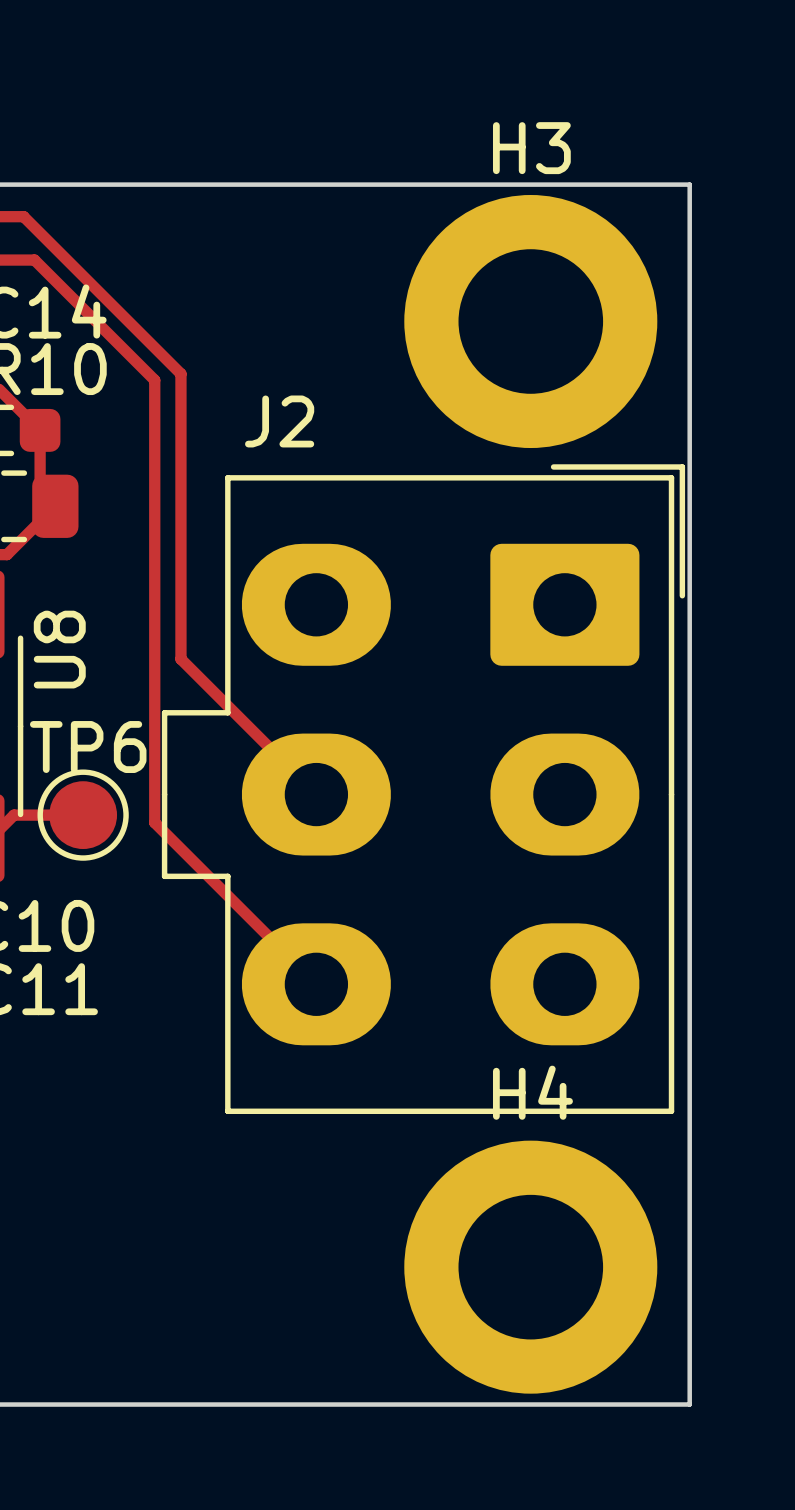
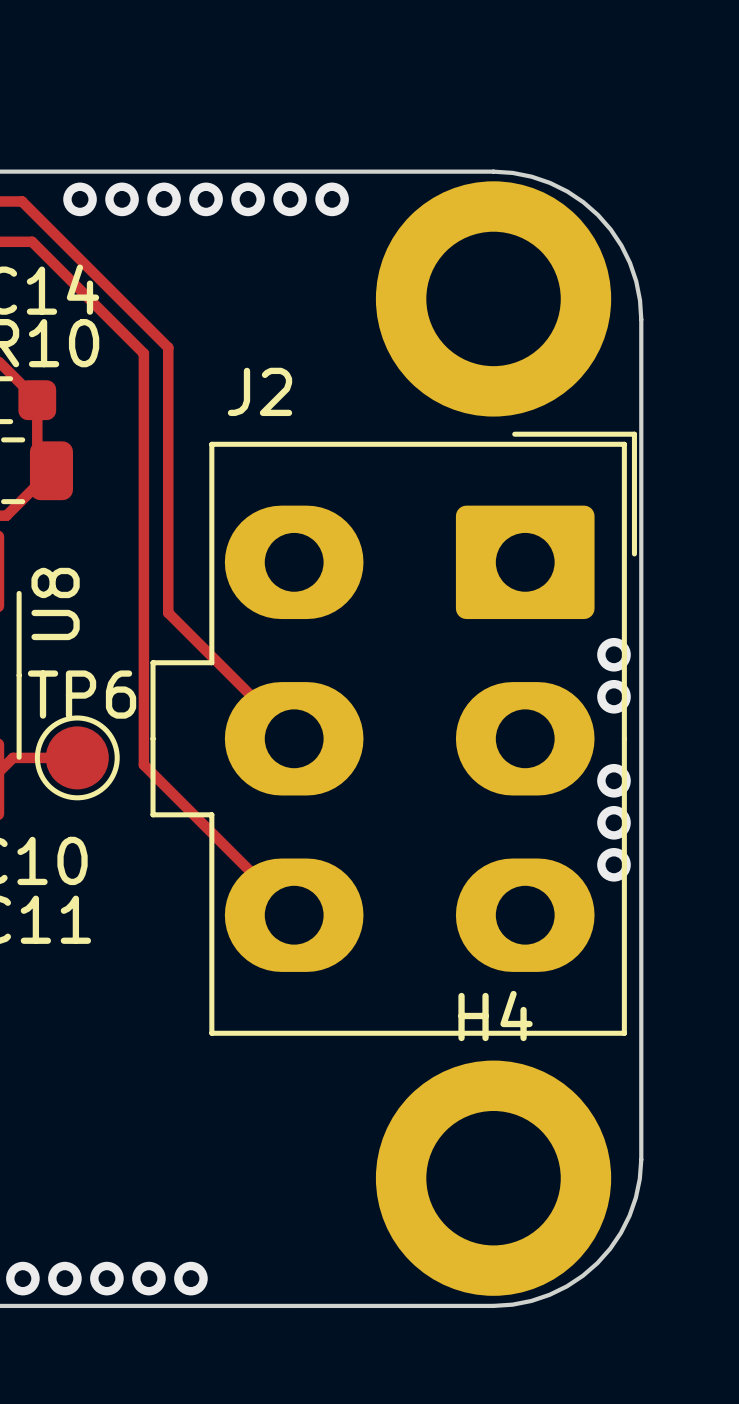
H3 name: H3 (531, 148) -> none
board edge: (530, 184) (689, 184) (689, 343) -> (493, 171) (512, 172) (550, 182) (567, 191) (597, 215) (621, 245) (630, 263) (636, 281) (641, 319)
via: none -> (80, 199)
via: none -> (122, 199)
via: none -> (164, 199)
via: none -> (206, 199)
via: none -> (248, 199)
via: none -> (290, 199)
via: none -> (332, 199)
via: none -> (613, 654)
via: none -> (613, 696)
via: none -> (613, 780)
via: none -> (613, 822)
via: none -> (613, 864)
board edge: (689, 1247) (689, 1404) (530, 1404) -> (641, 1159) (635, 1197) (629, 1215) (610, 1248) (597, 1263) (582, 1275) (549, 1294) (512, 1304) (493, 1305)
via: none -> (22, 1278)
via: none -> (64, 1278)
via: none -> (106, 1278)
via: none -> (148, 1278)
via: none -> (190, 1278)

